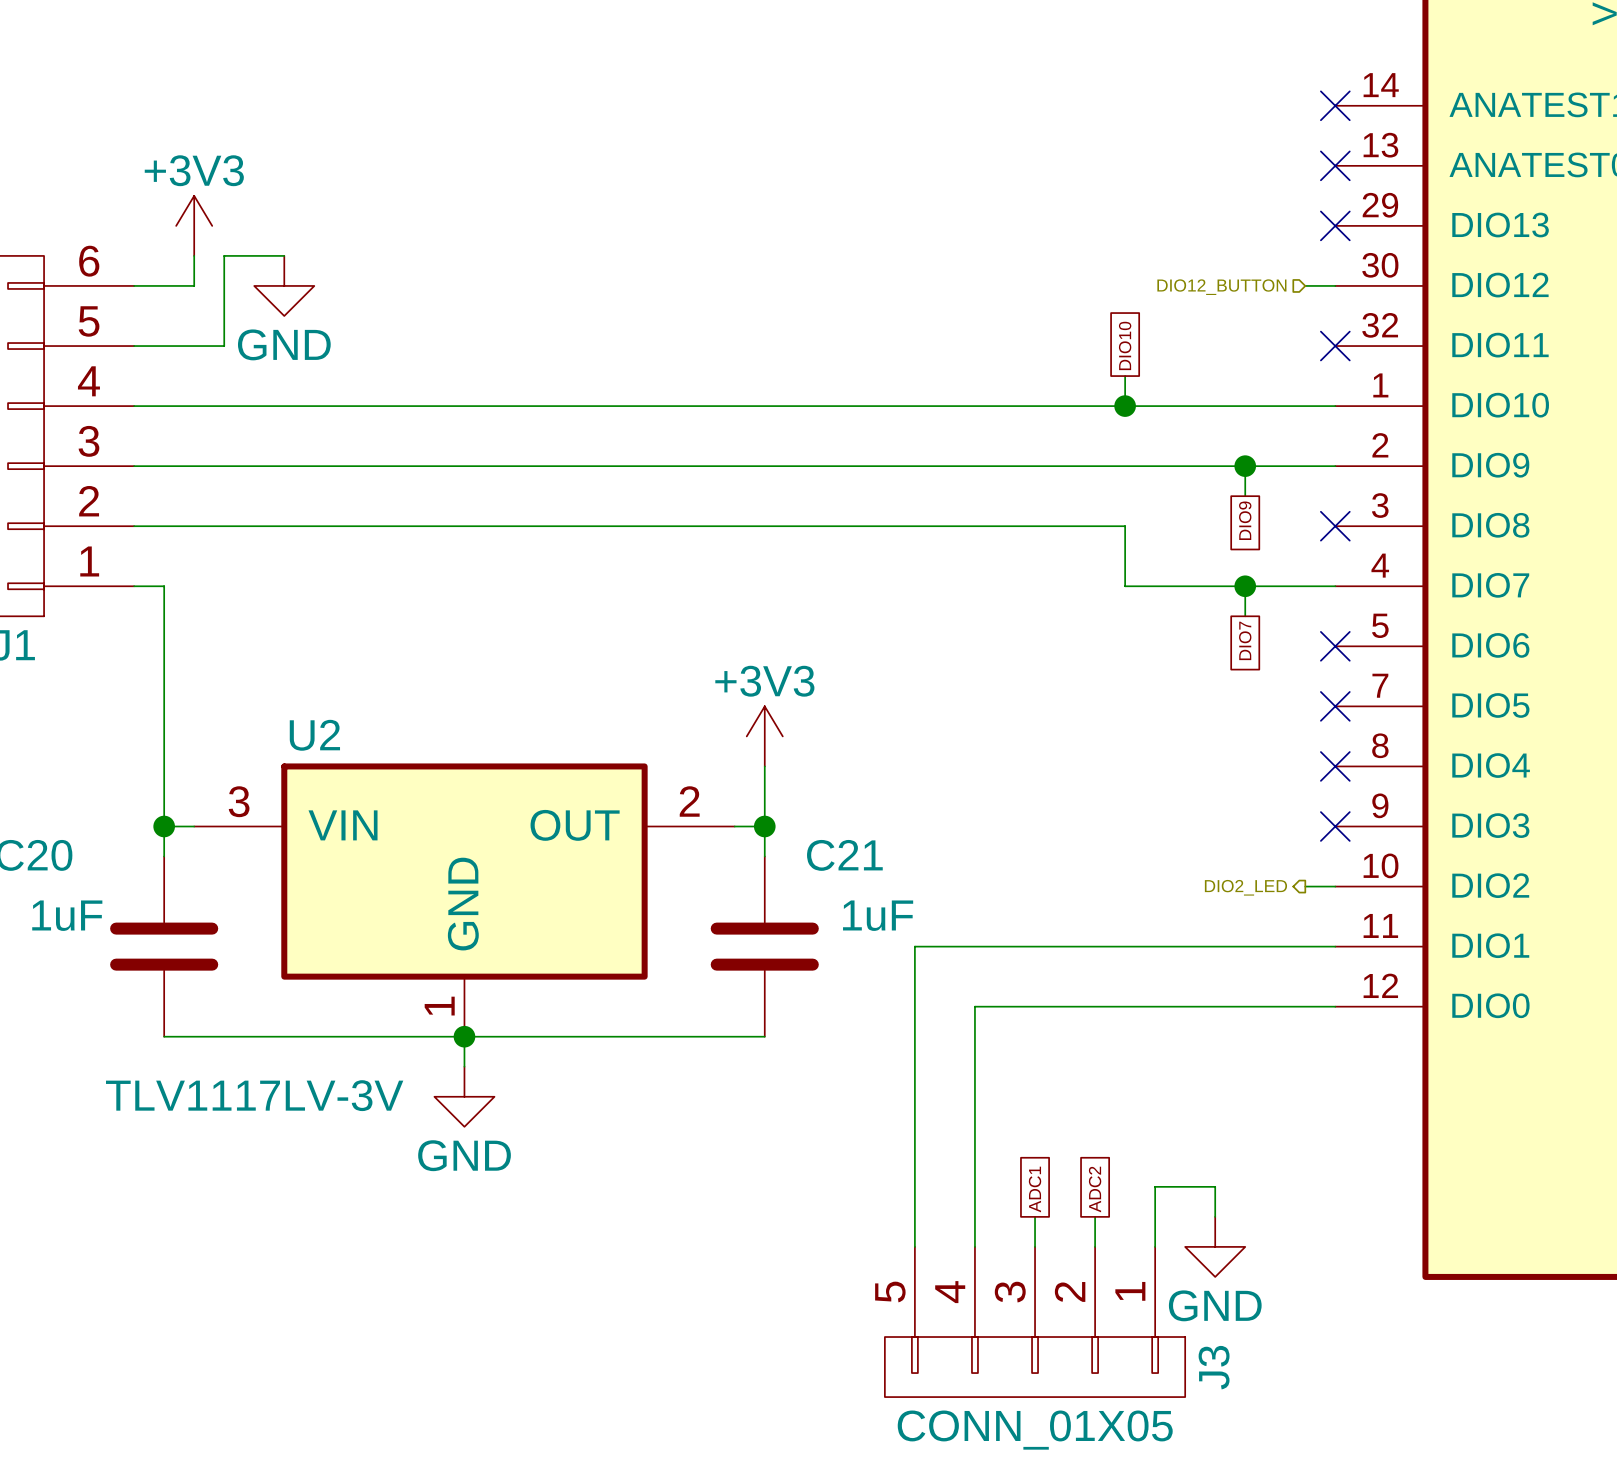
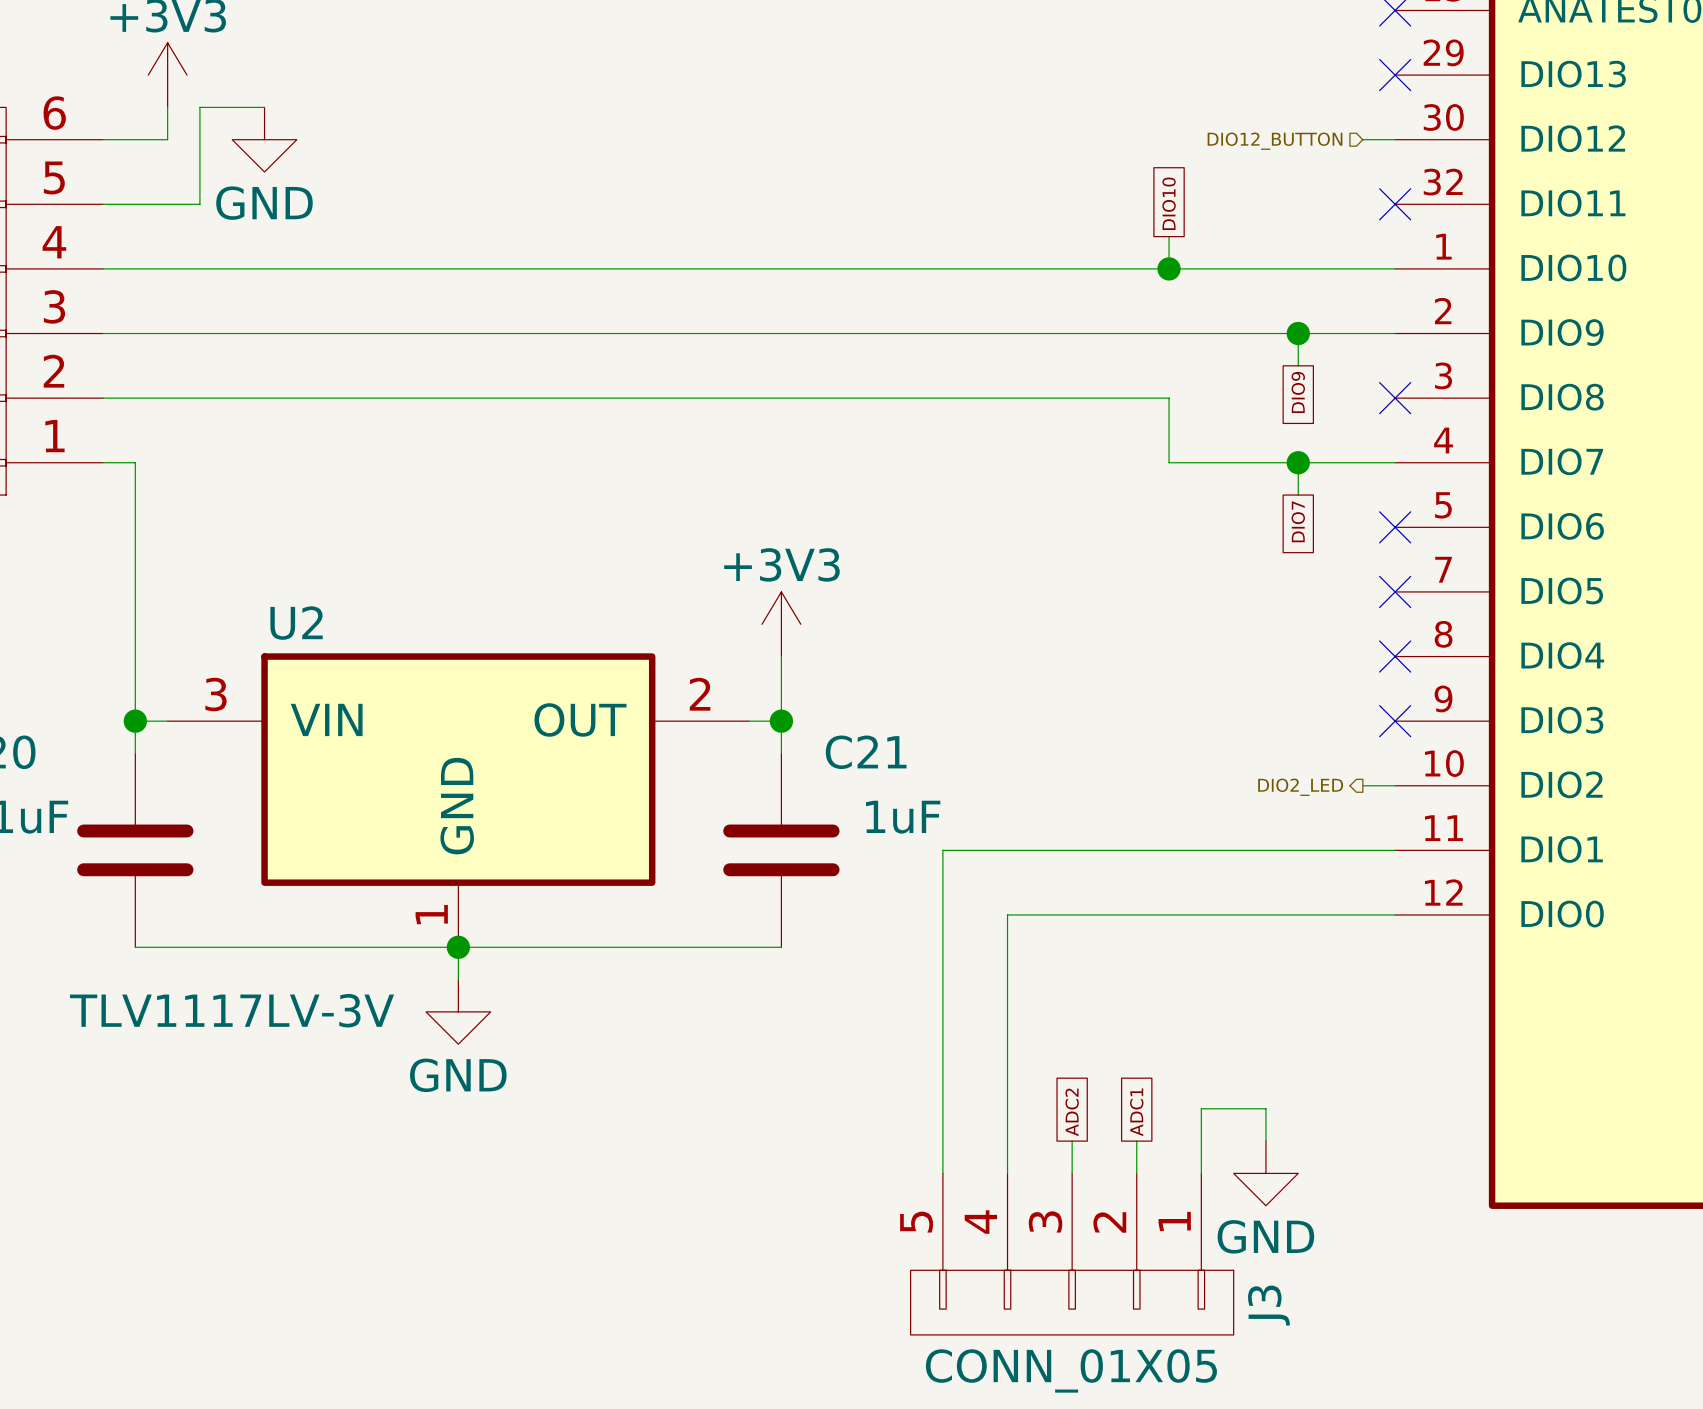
global label: ADC1 (1035, 1189) -> ADC2 (1072, 1112)
global label: ADC2 (1095, 1189) -> ADC1 (1136, 1112)

